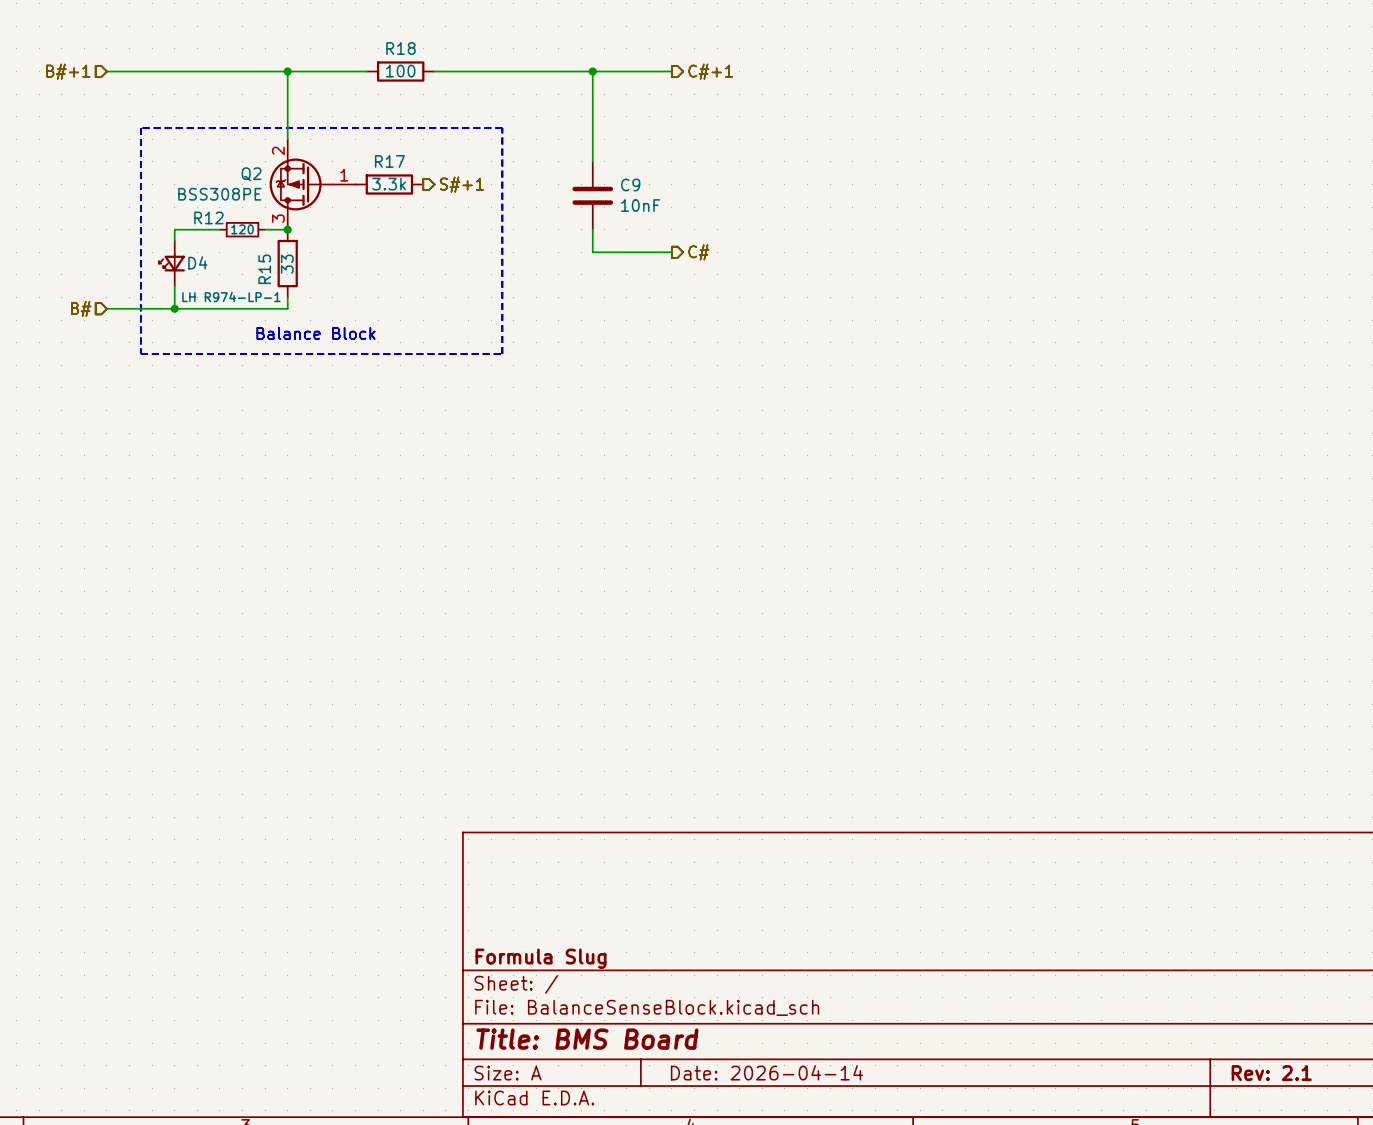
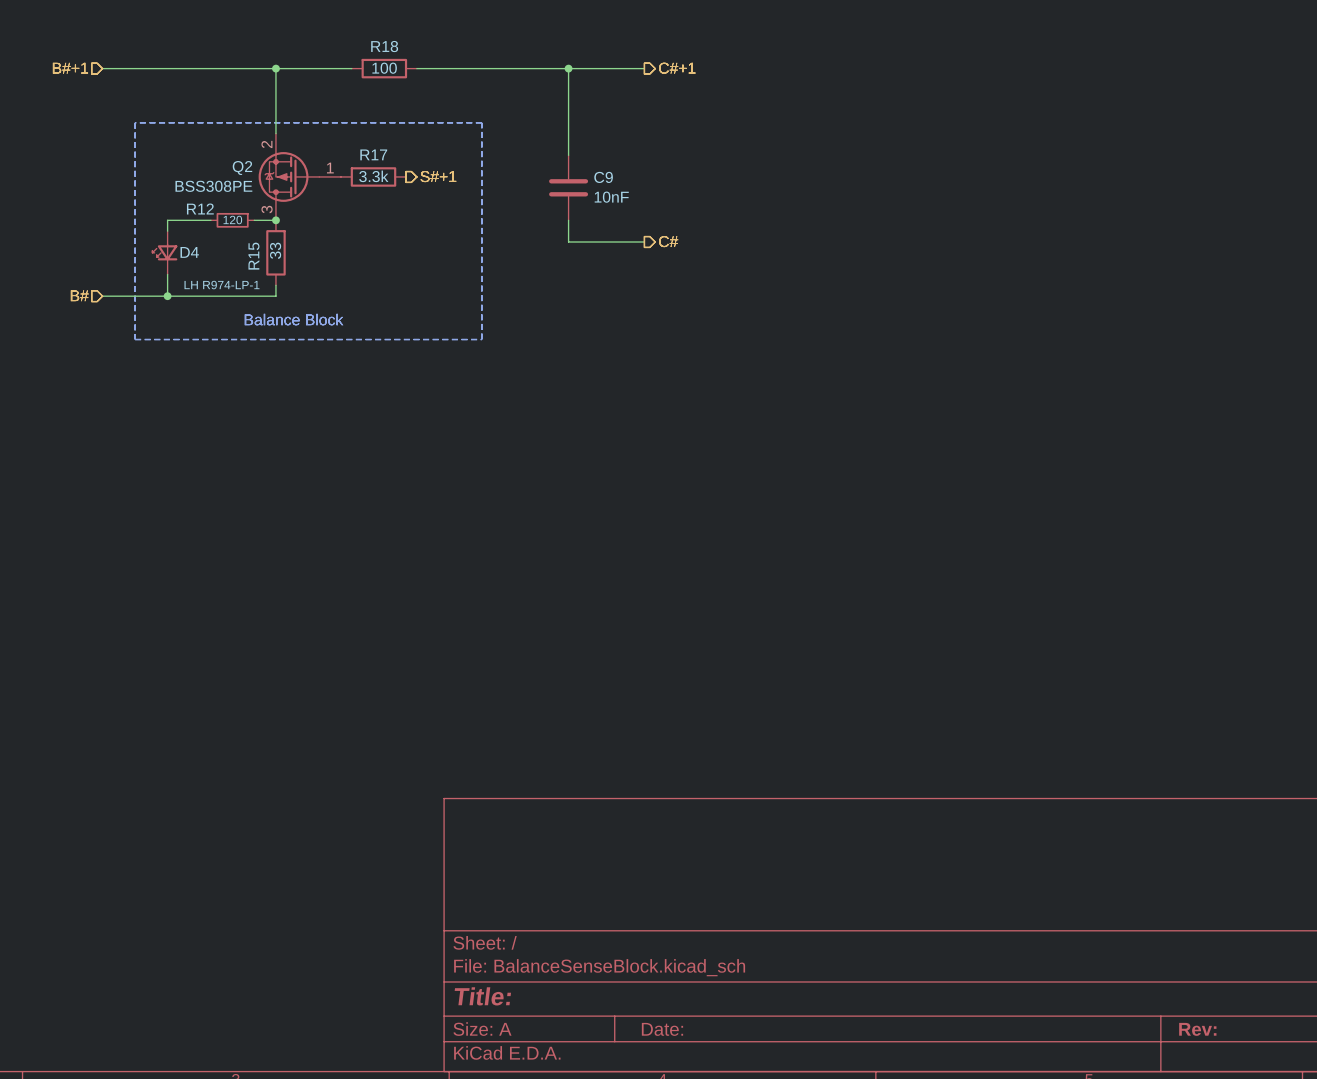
title block: Formula Slug (540, 958) -> none
title block: Title: BMS Board (587, 1039) -> Title: (482, 996)
title block: Date: 2026-04-14 (766, 1072) -> Date: (662, 1029)
title block: Rev: 2.1 (1271, 1073) -> Rev: (1197, 1029)

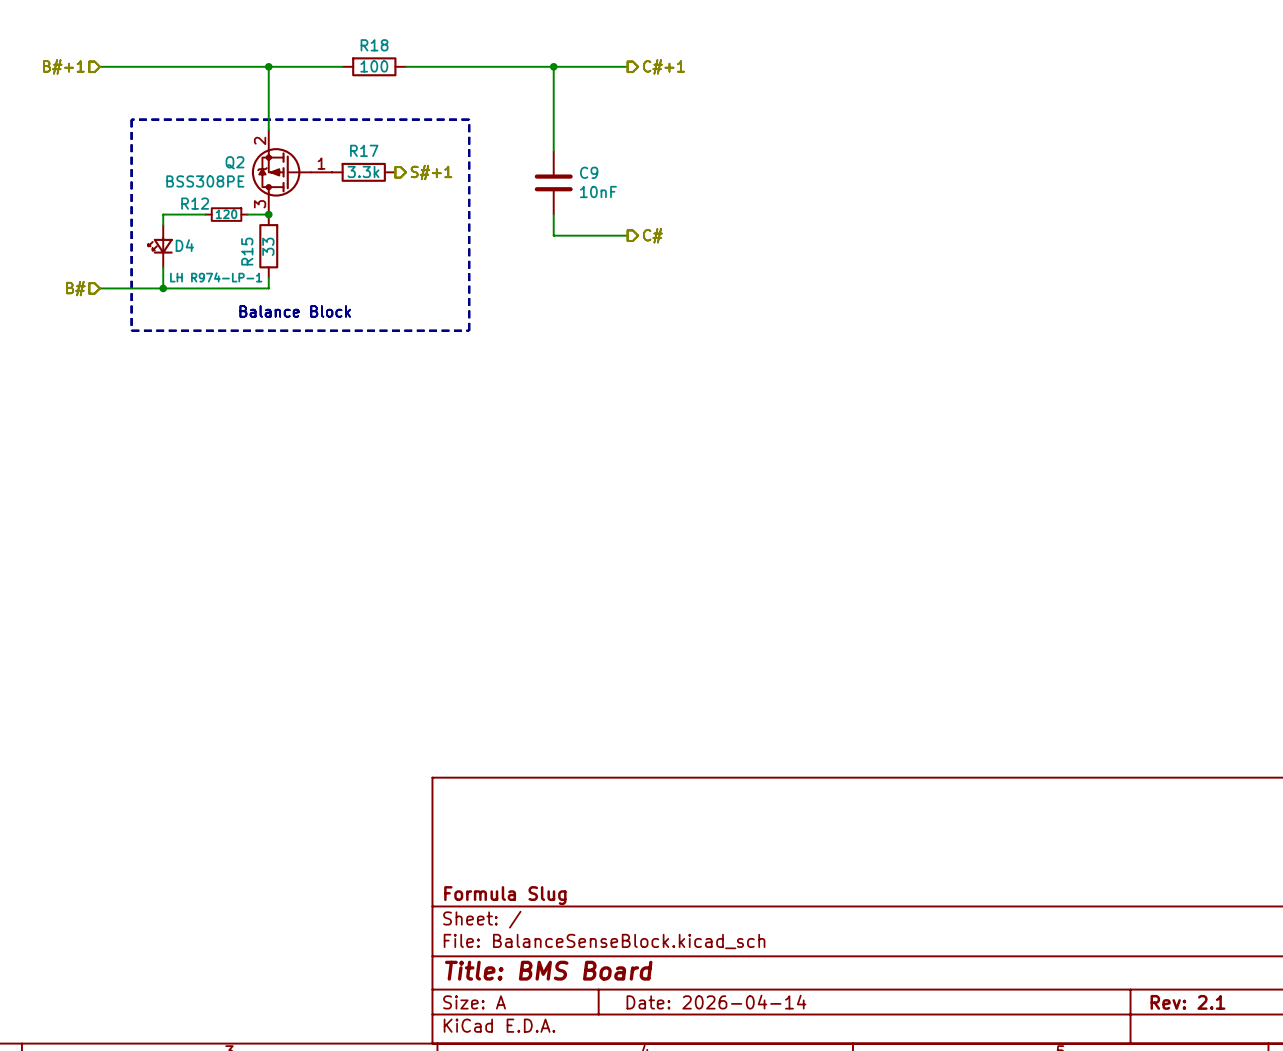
title block: none -> Formula Slug (505, 895)
title block: Title: (482, 996) -> Title: BMS Board (548, 970)
title block: Date: (662, 1029) -> Date: 2026-04-14 (716, 1002)
title block: Rev: (1197, 1029) -> Rev: 2.1 (1187, 1002)

